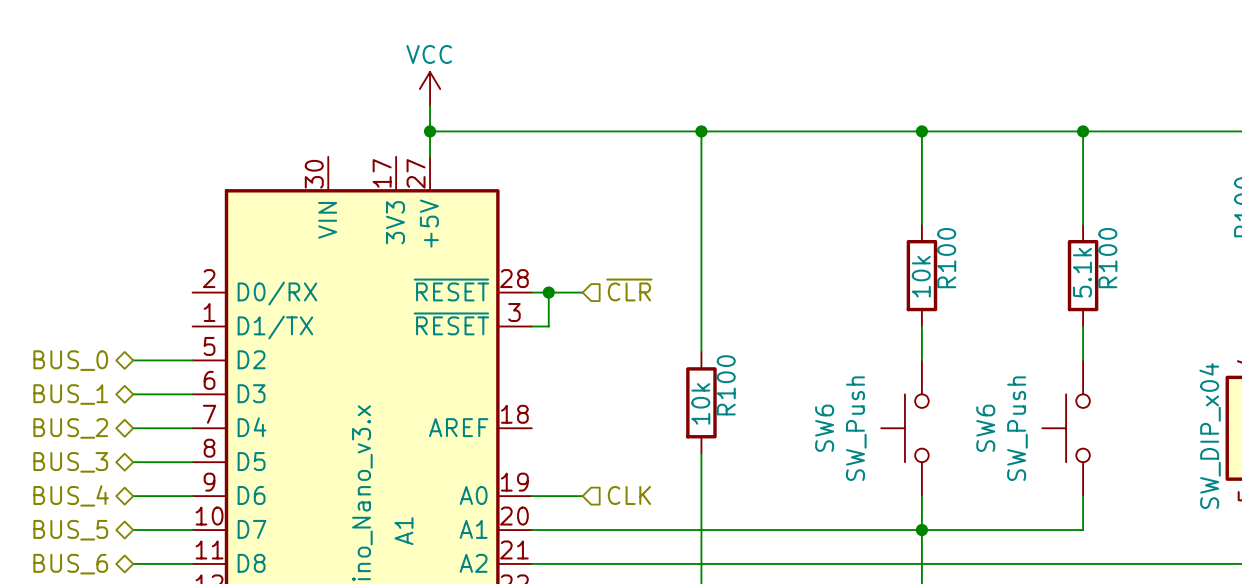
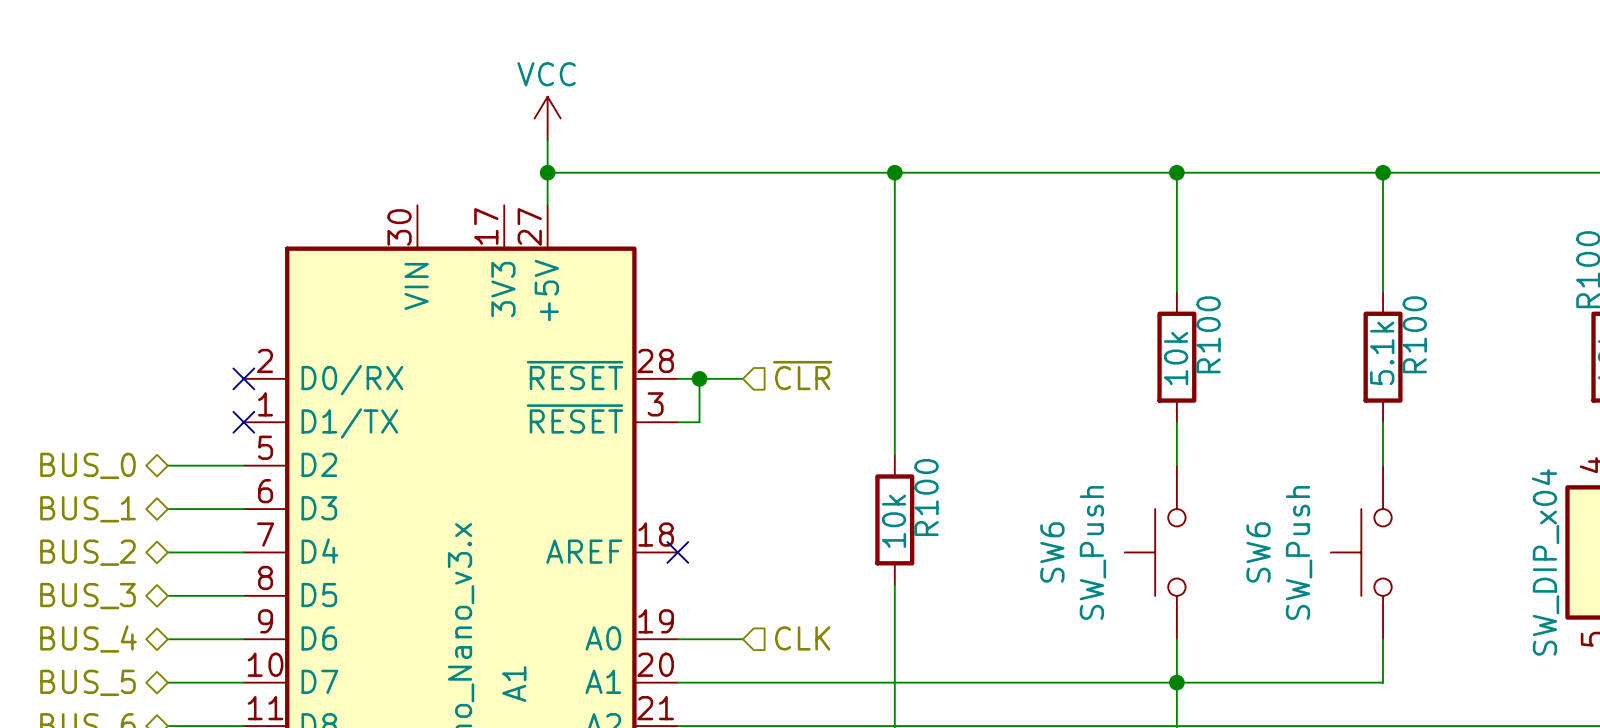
no-connect mark: none -> (243, 378)
no-connect mark: none -> (243, 422)
no-connect mark: none -> (677, 552)

